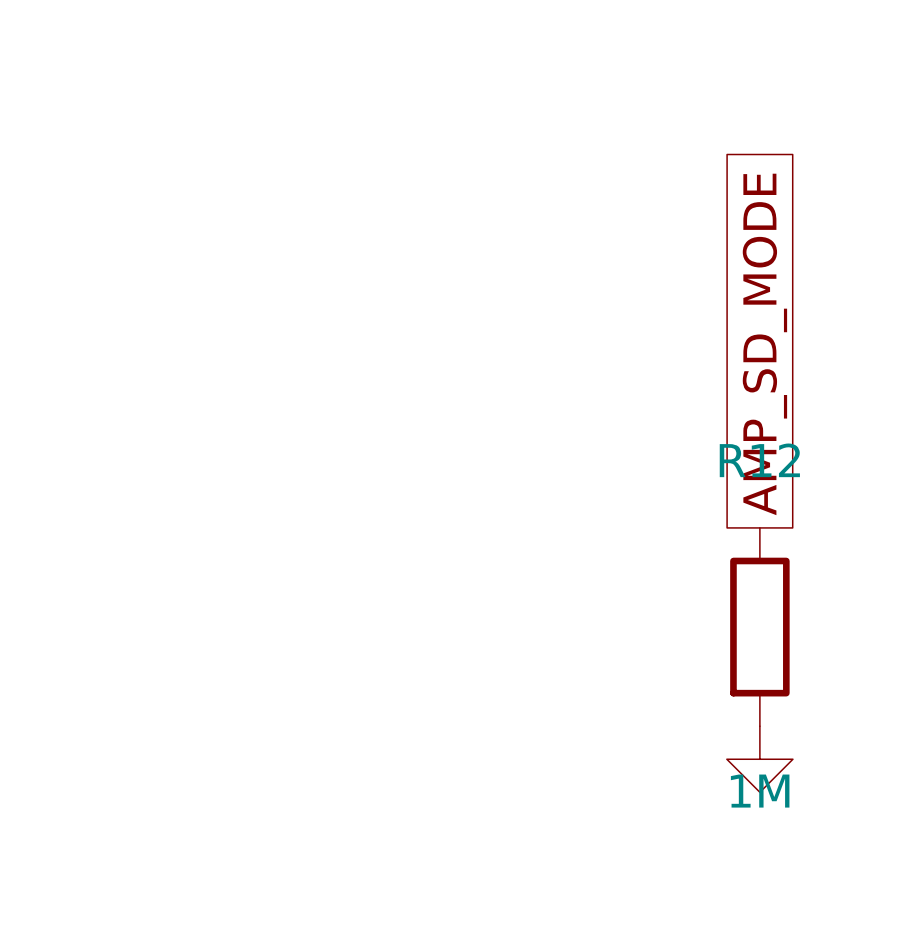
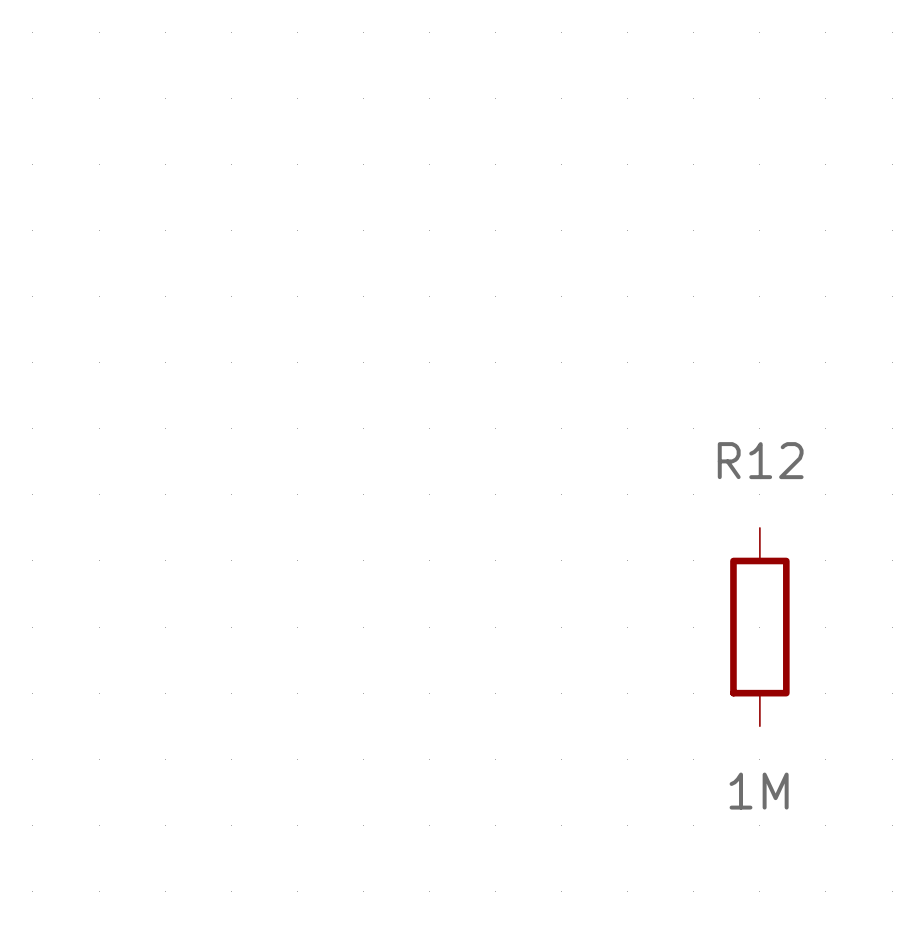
global label: AMP_SD_MODE (764, 344) -> none
power symbol: (759, 759) -> none

